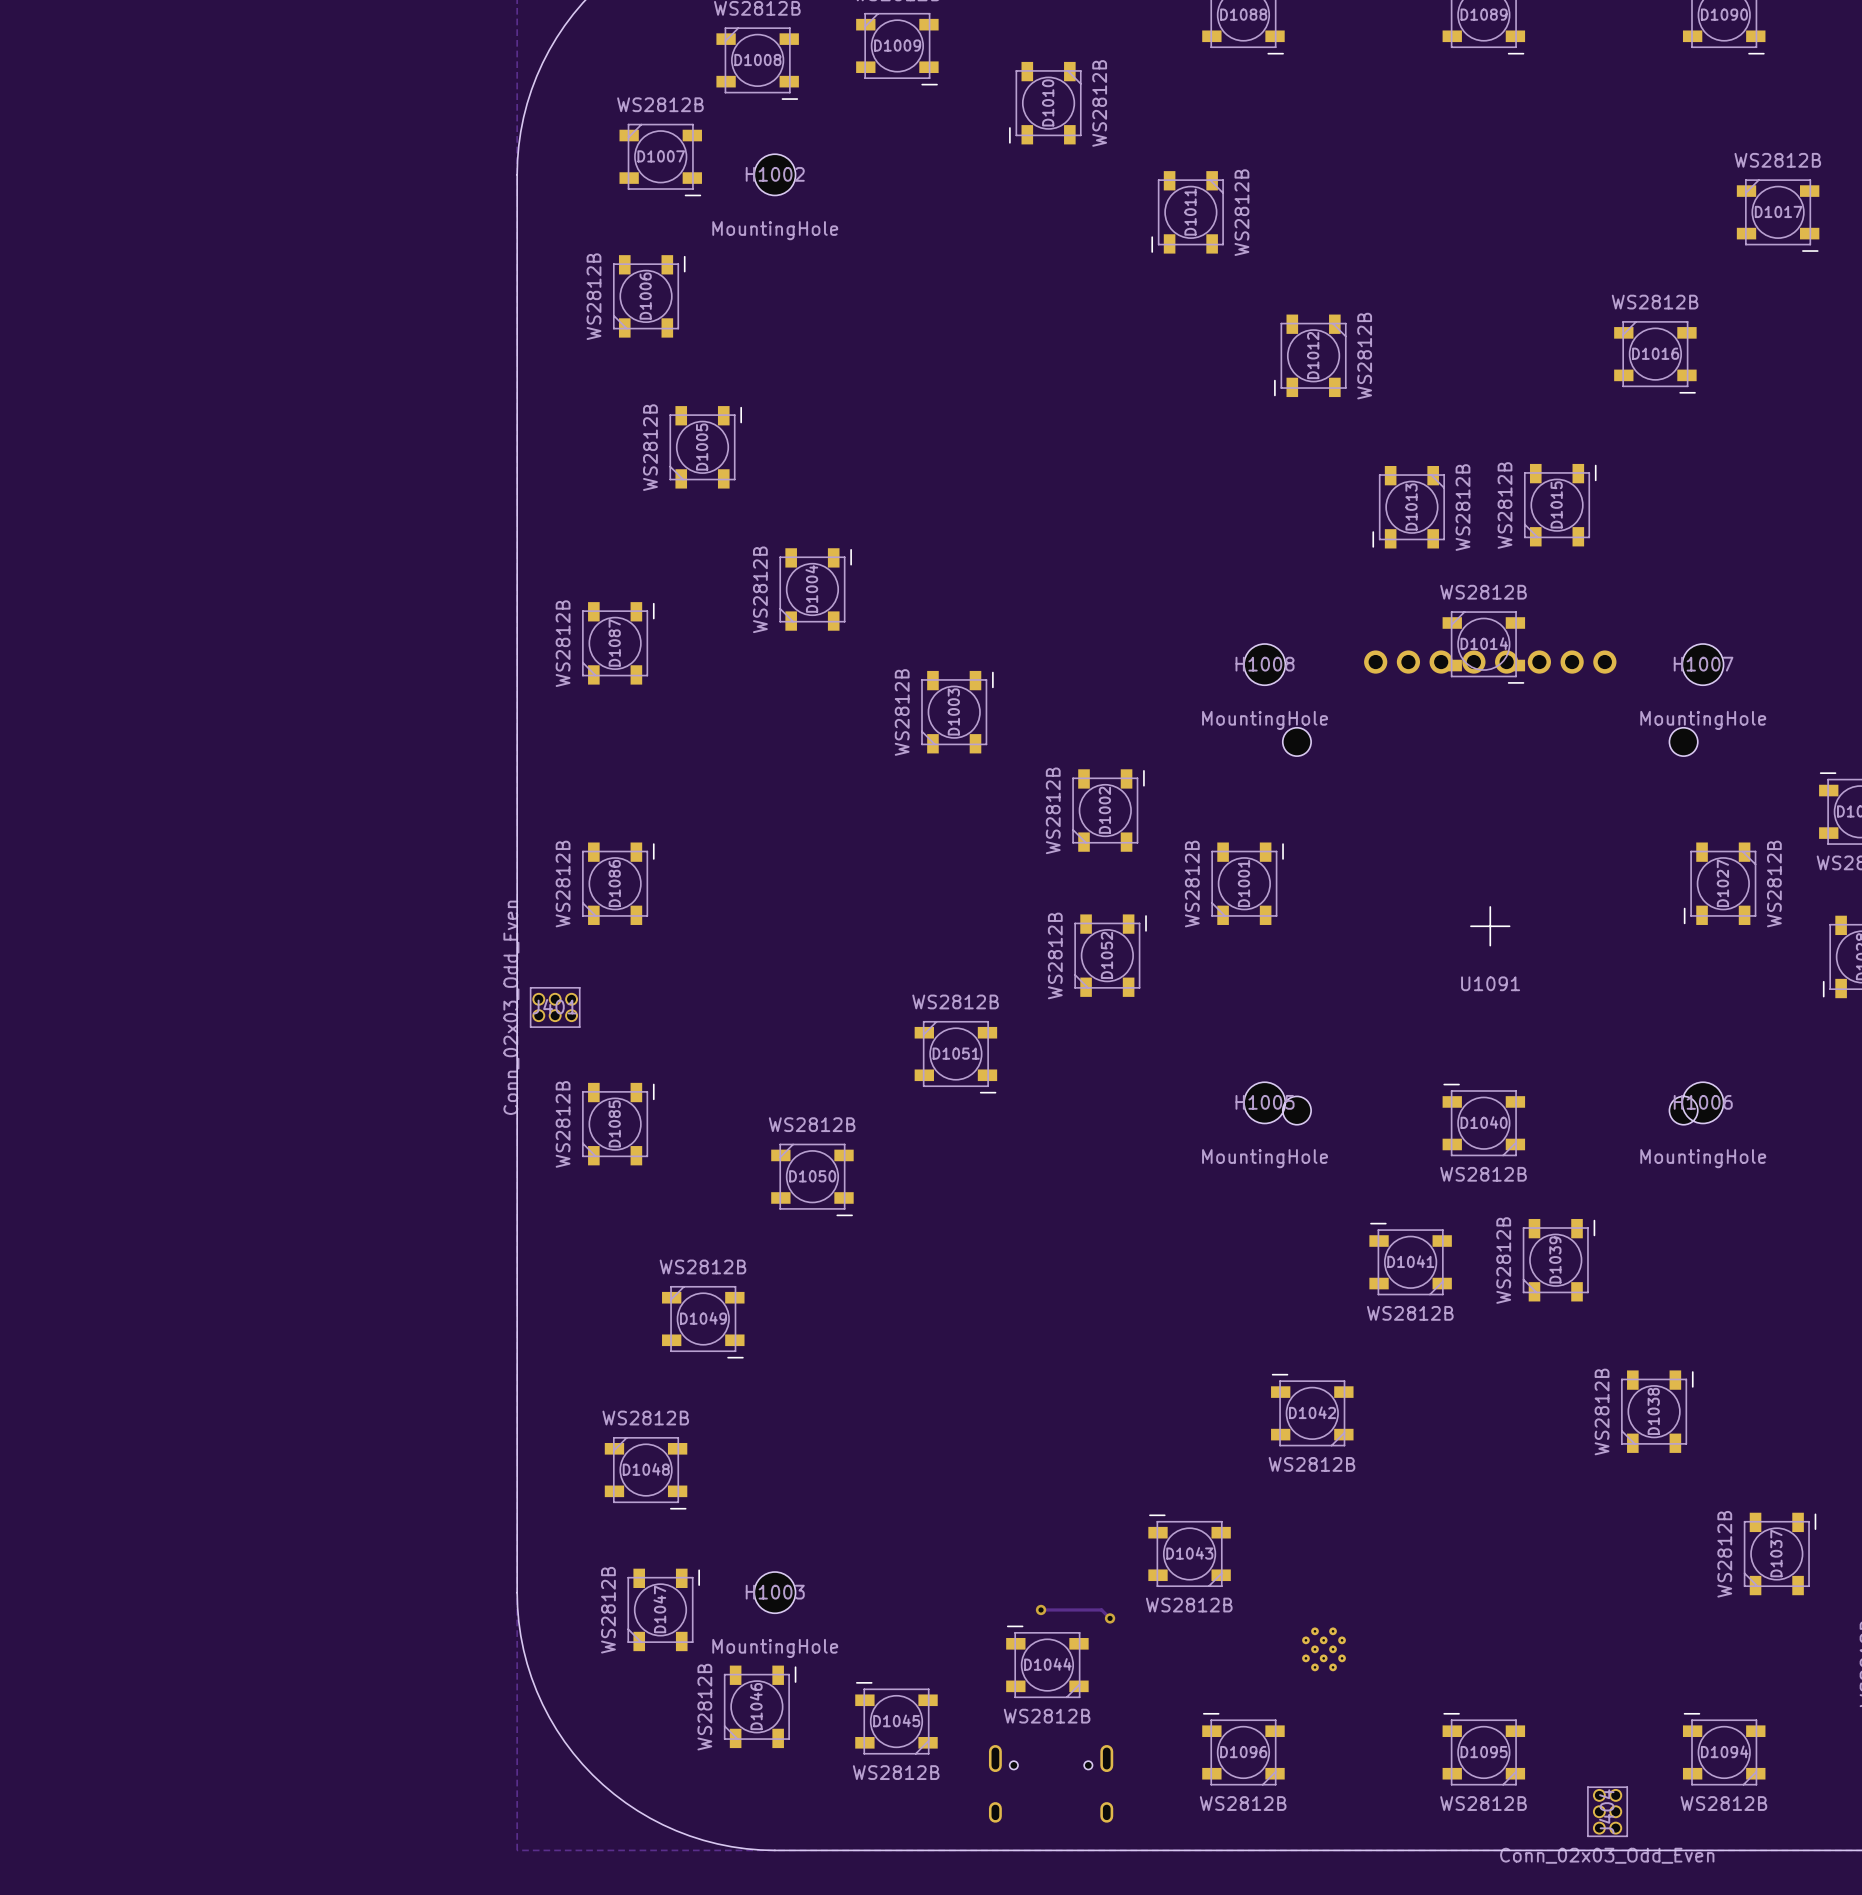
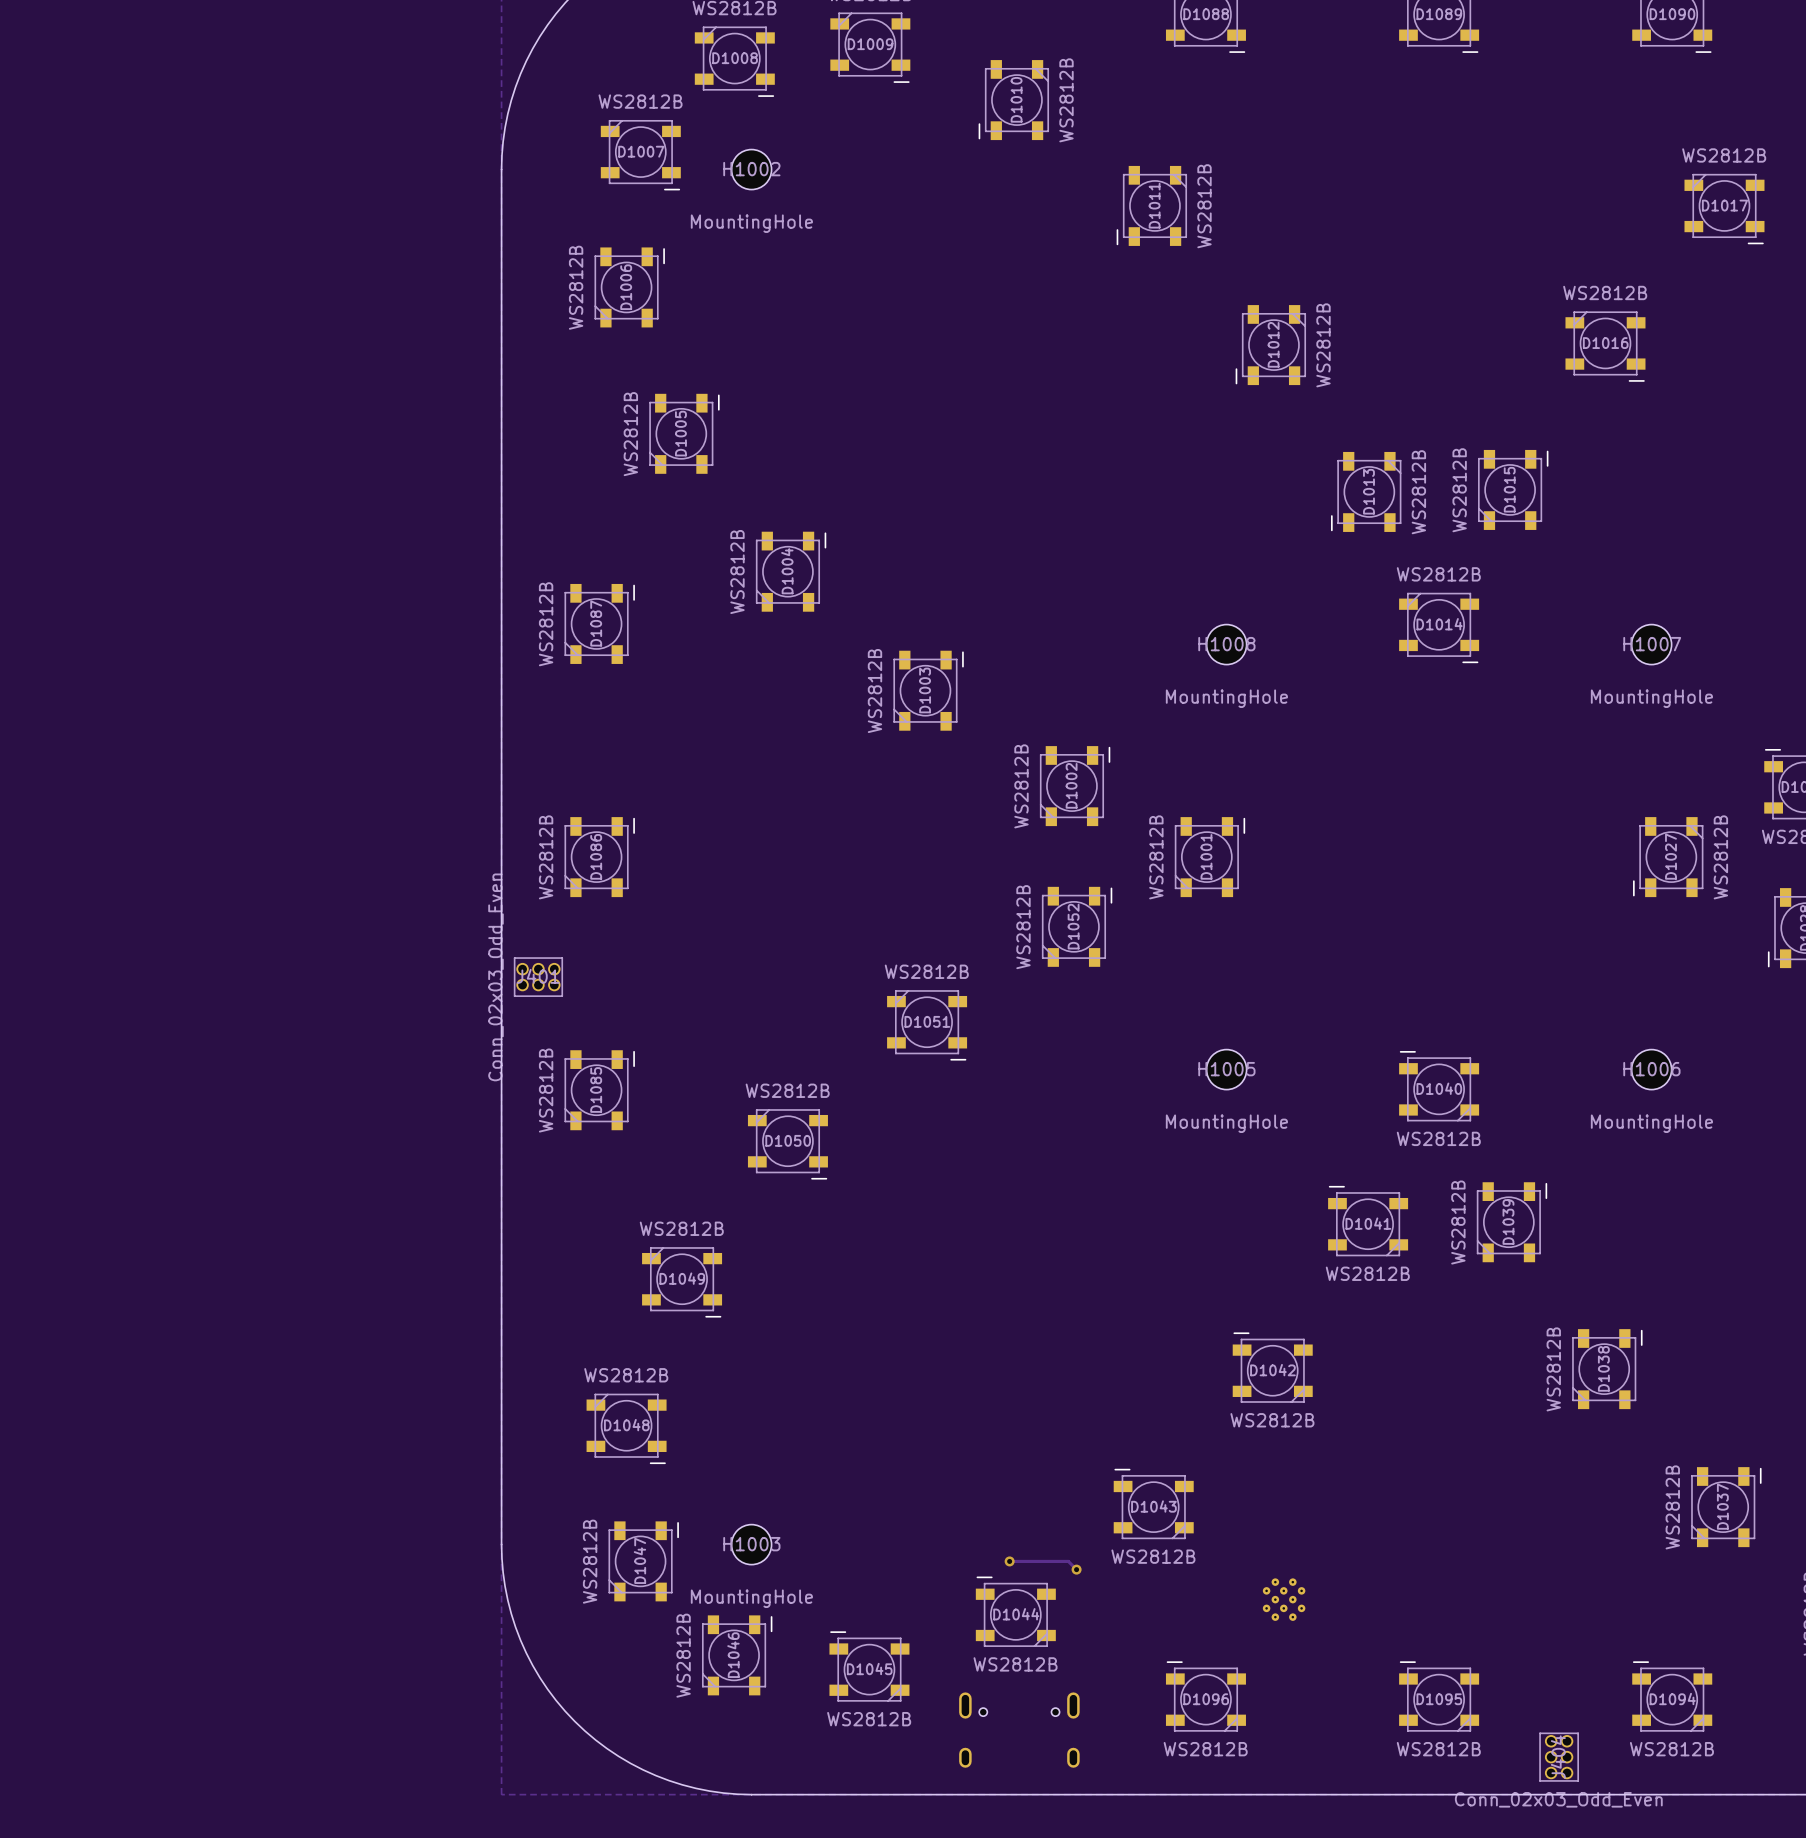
U1091: (1490, 887) -> none

